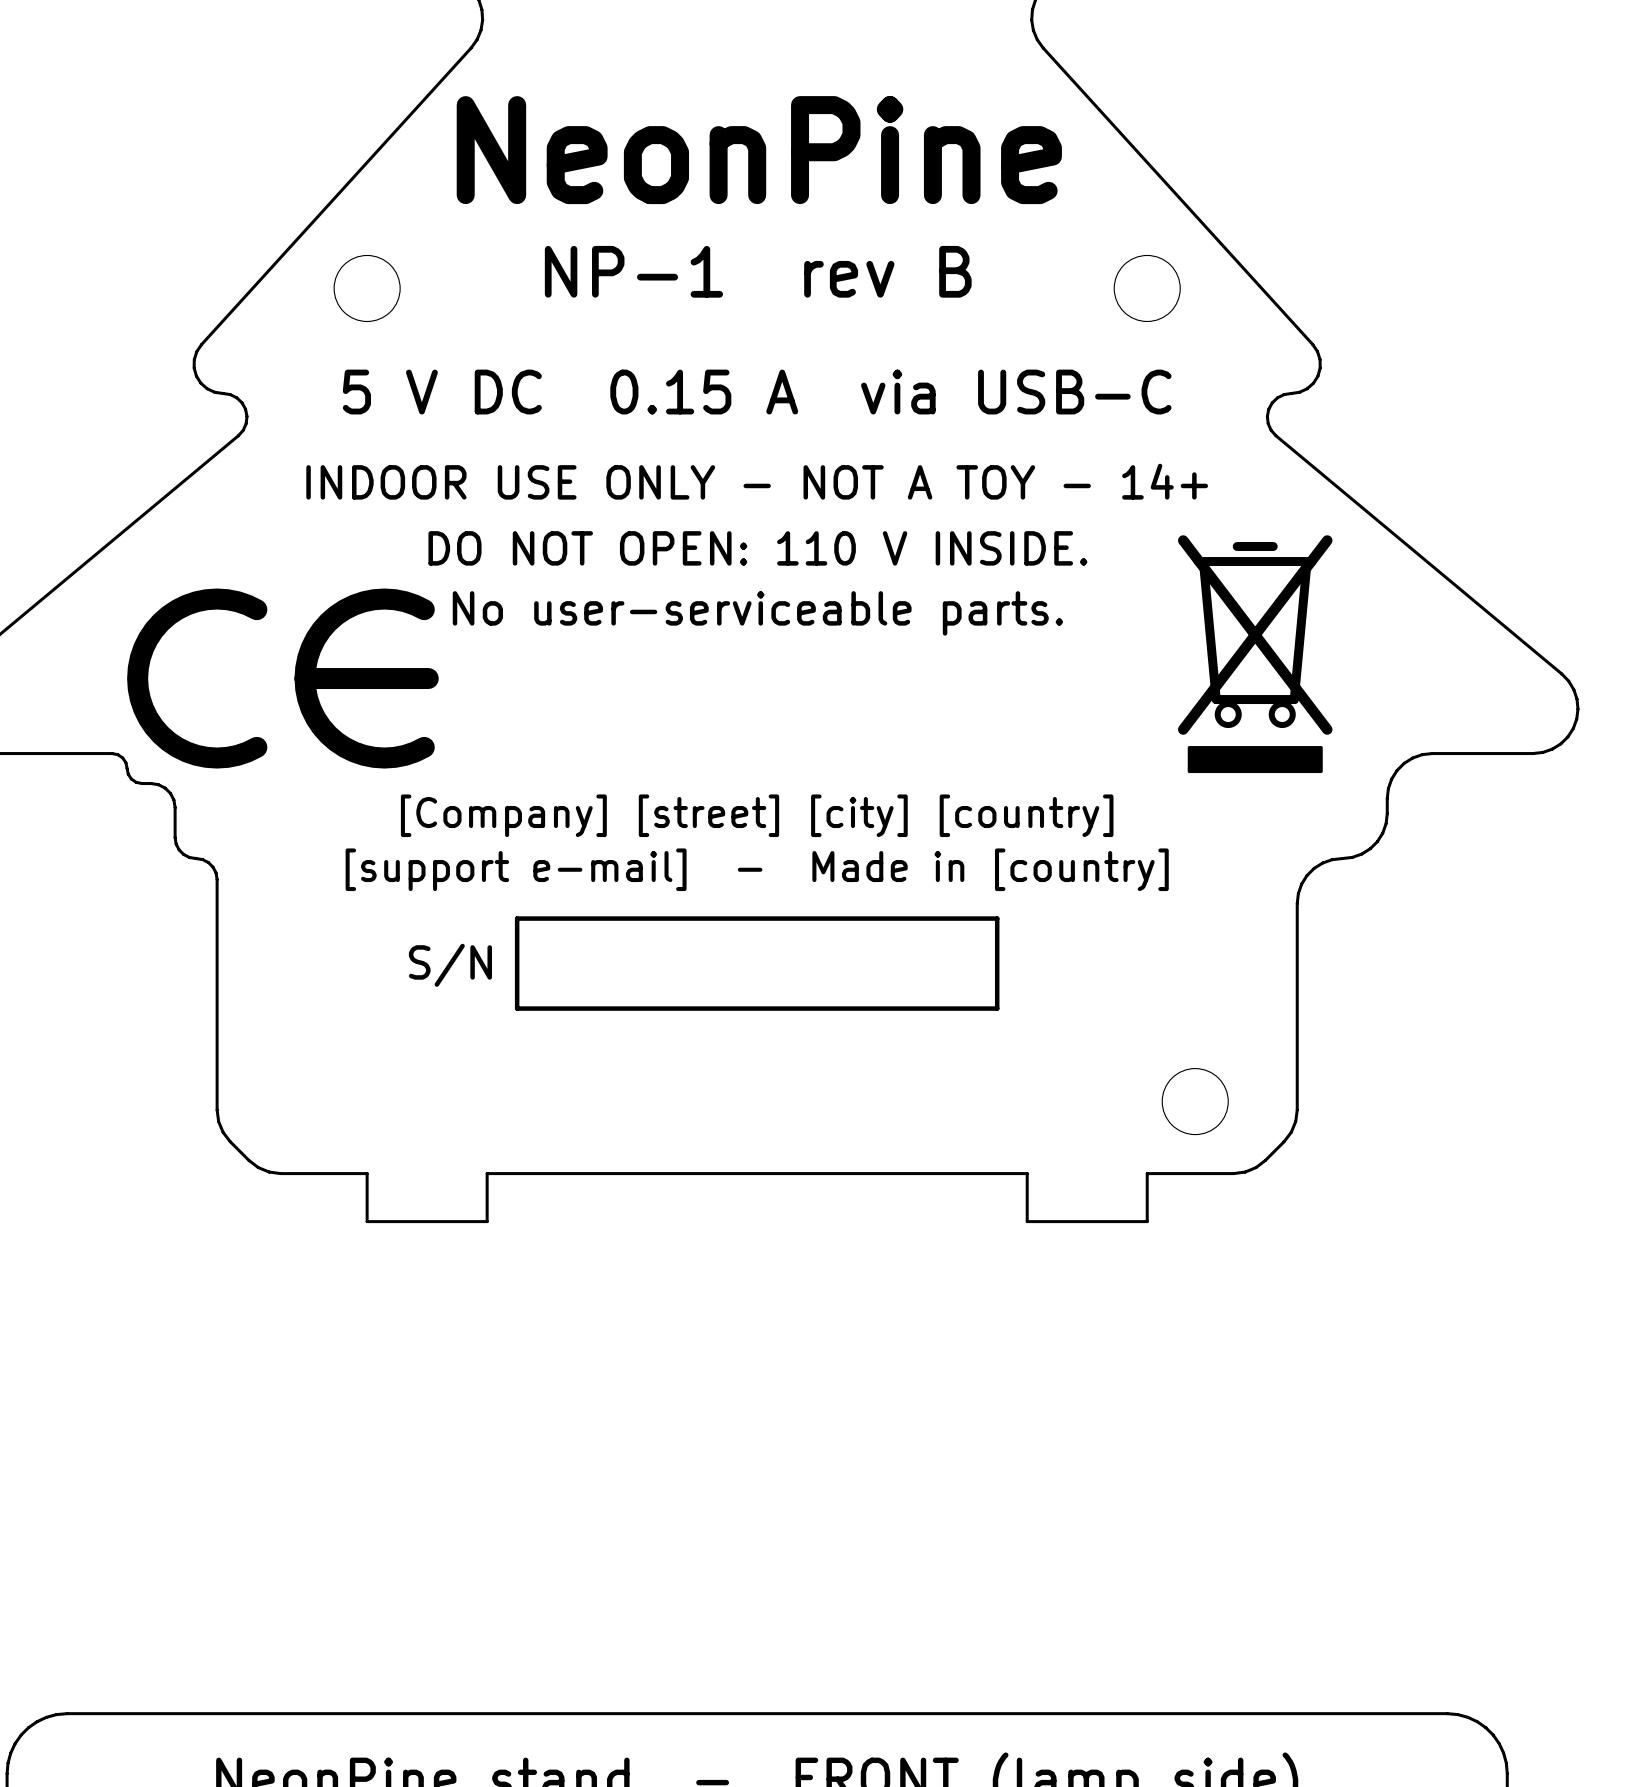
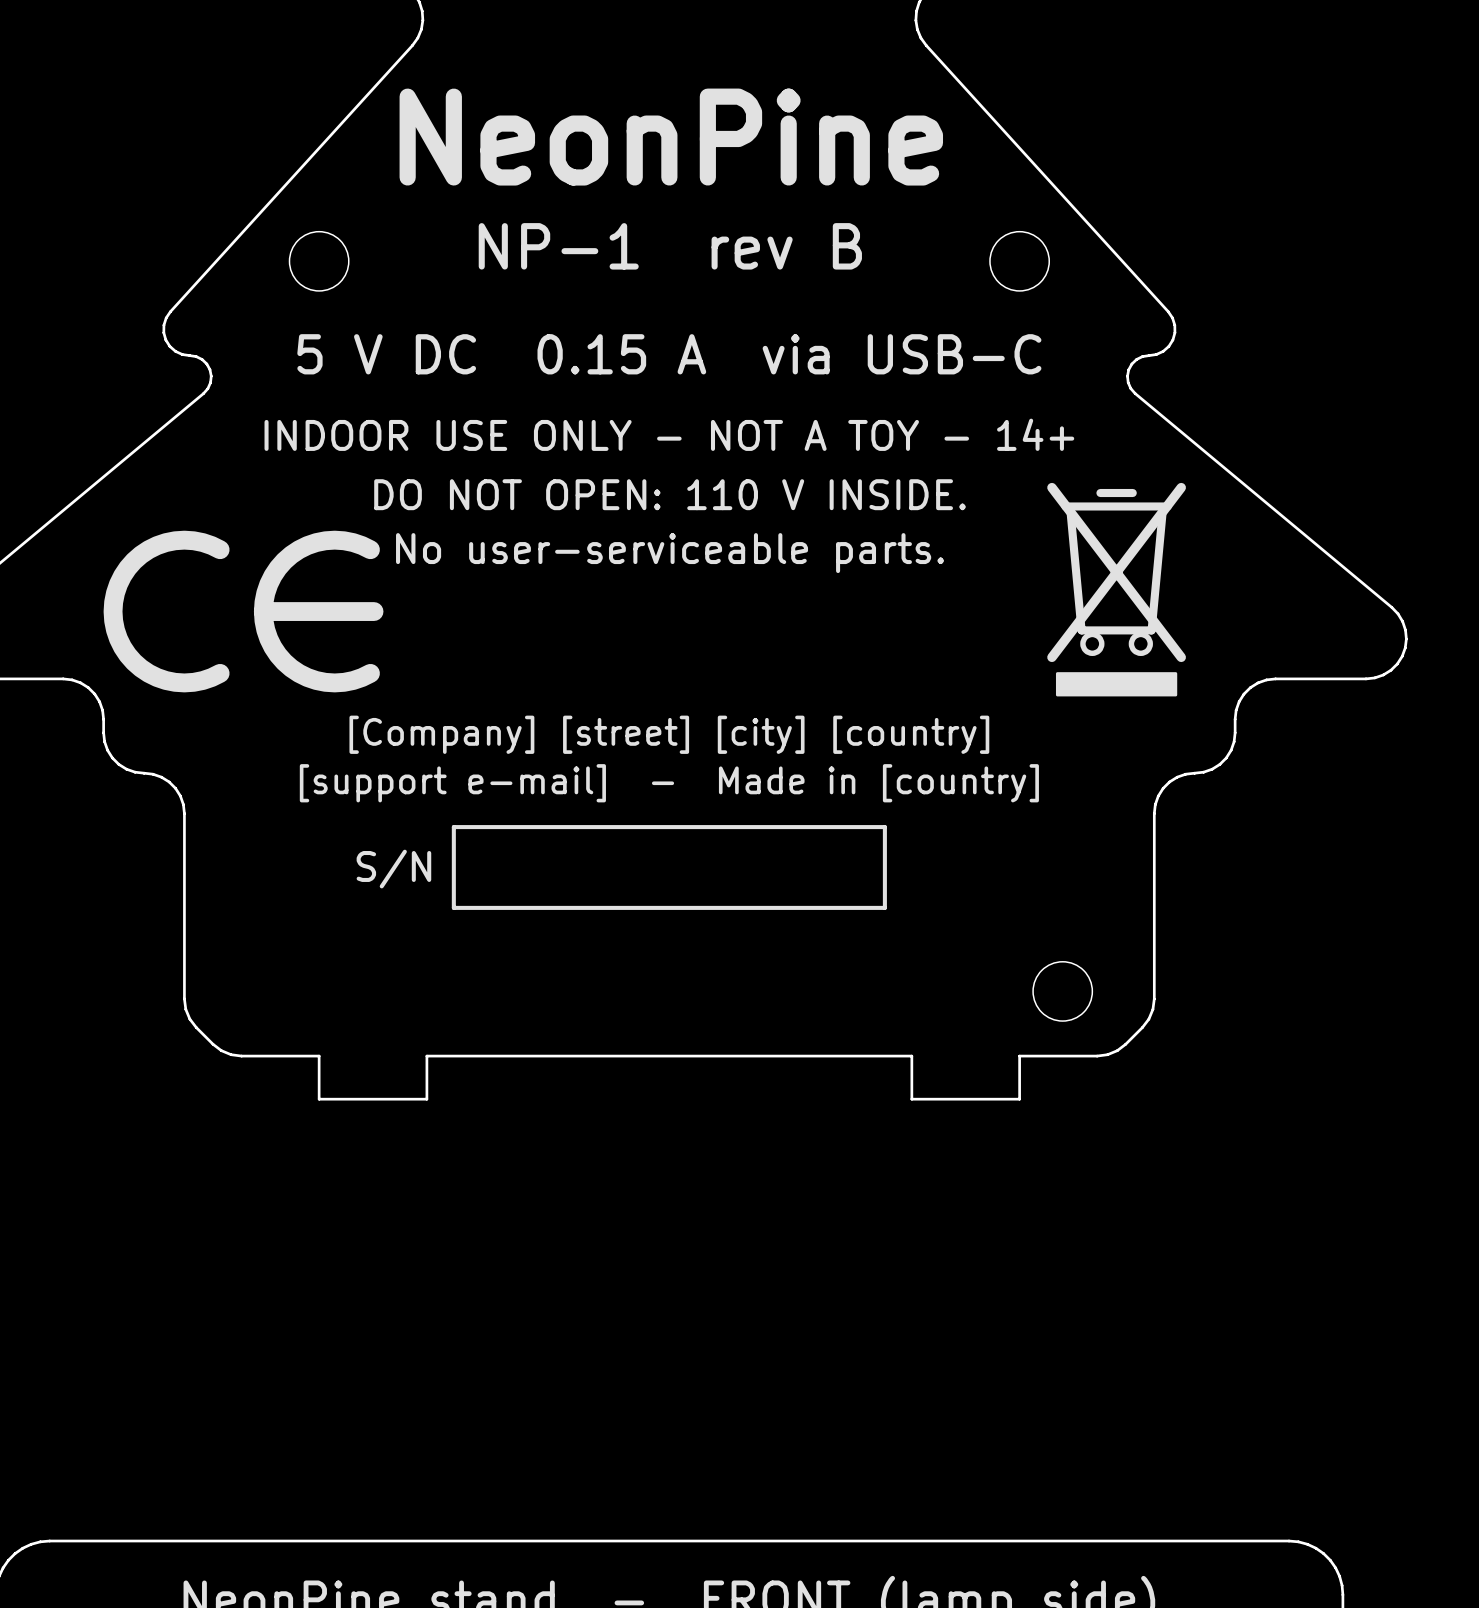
board edge: (82, 753) (117, 754) (125, 762) (128, 774) (131, 779) (136, 782) (158, 784) (170, 793) (175, 807) (176, 844) (183, 854) (202, 859) (213, 867) (217, 879) (217, 903) -> (63, 678) (80, 682) (94, 694) (99, 701) (102, 710) (104, 741) (112, 757) (126, 769) (153, 774) (169, 782) (180, 796) (184, 813)

